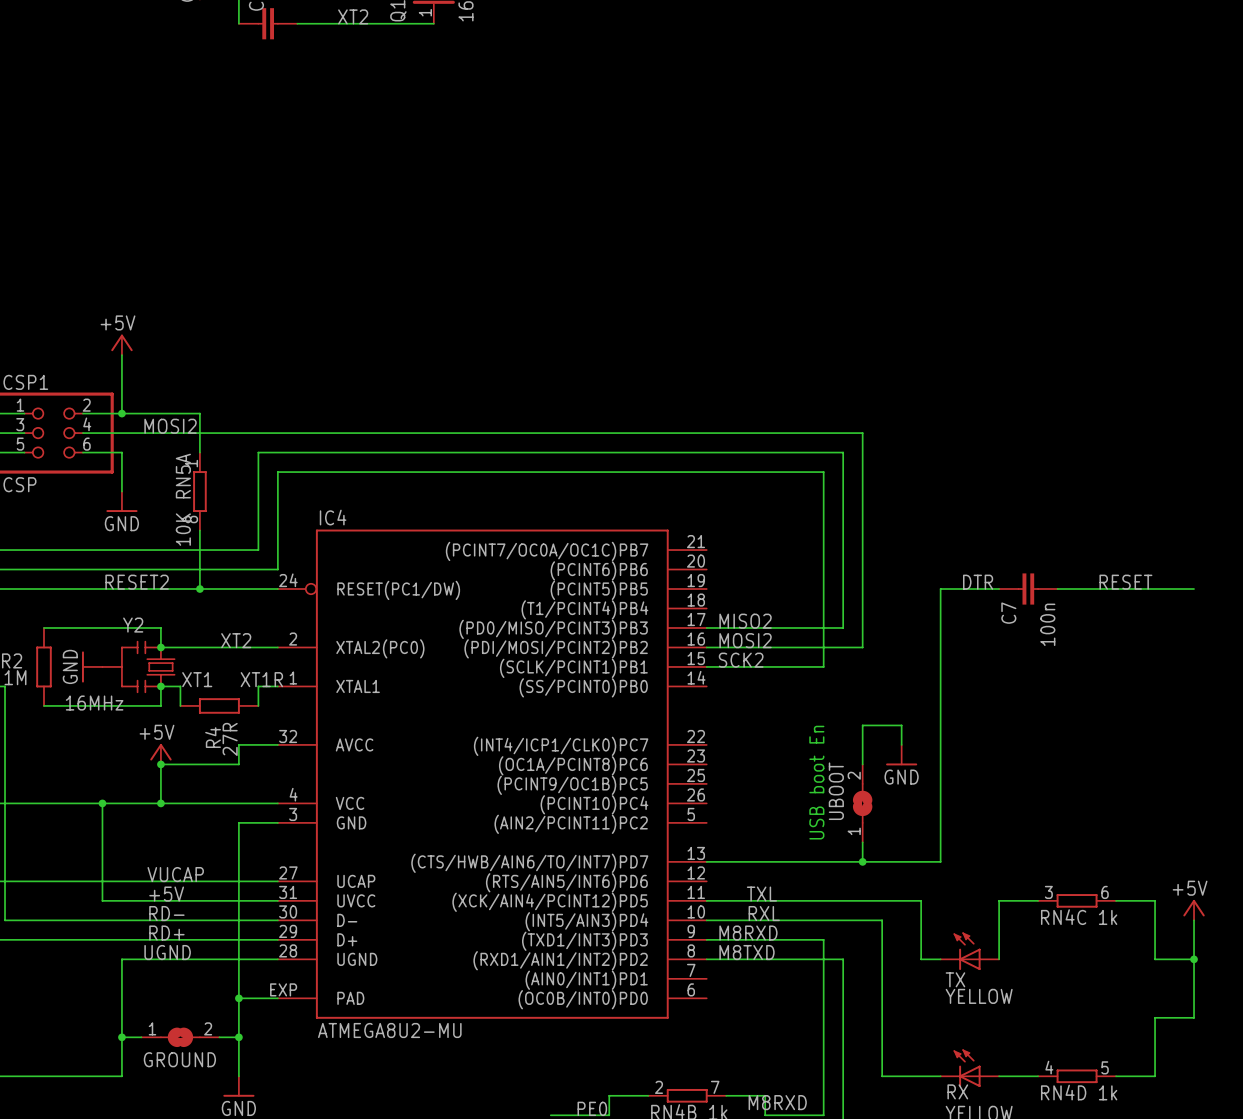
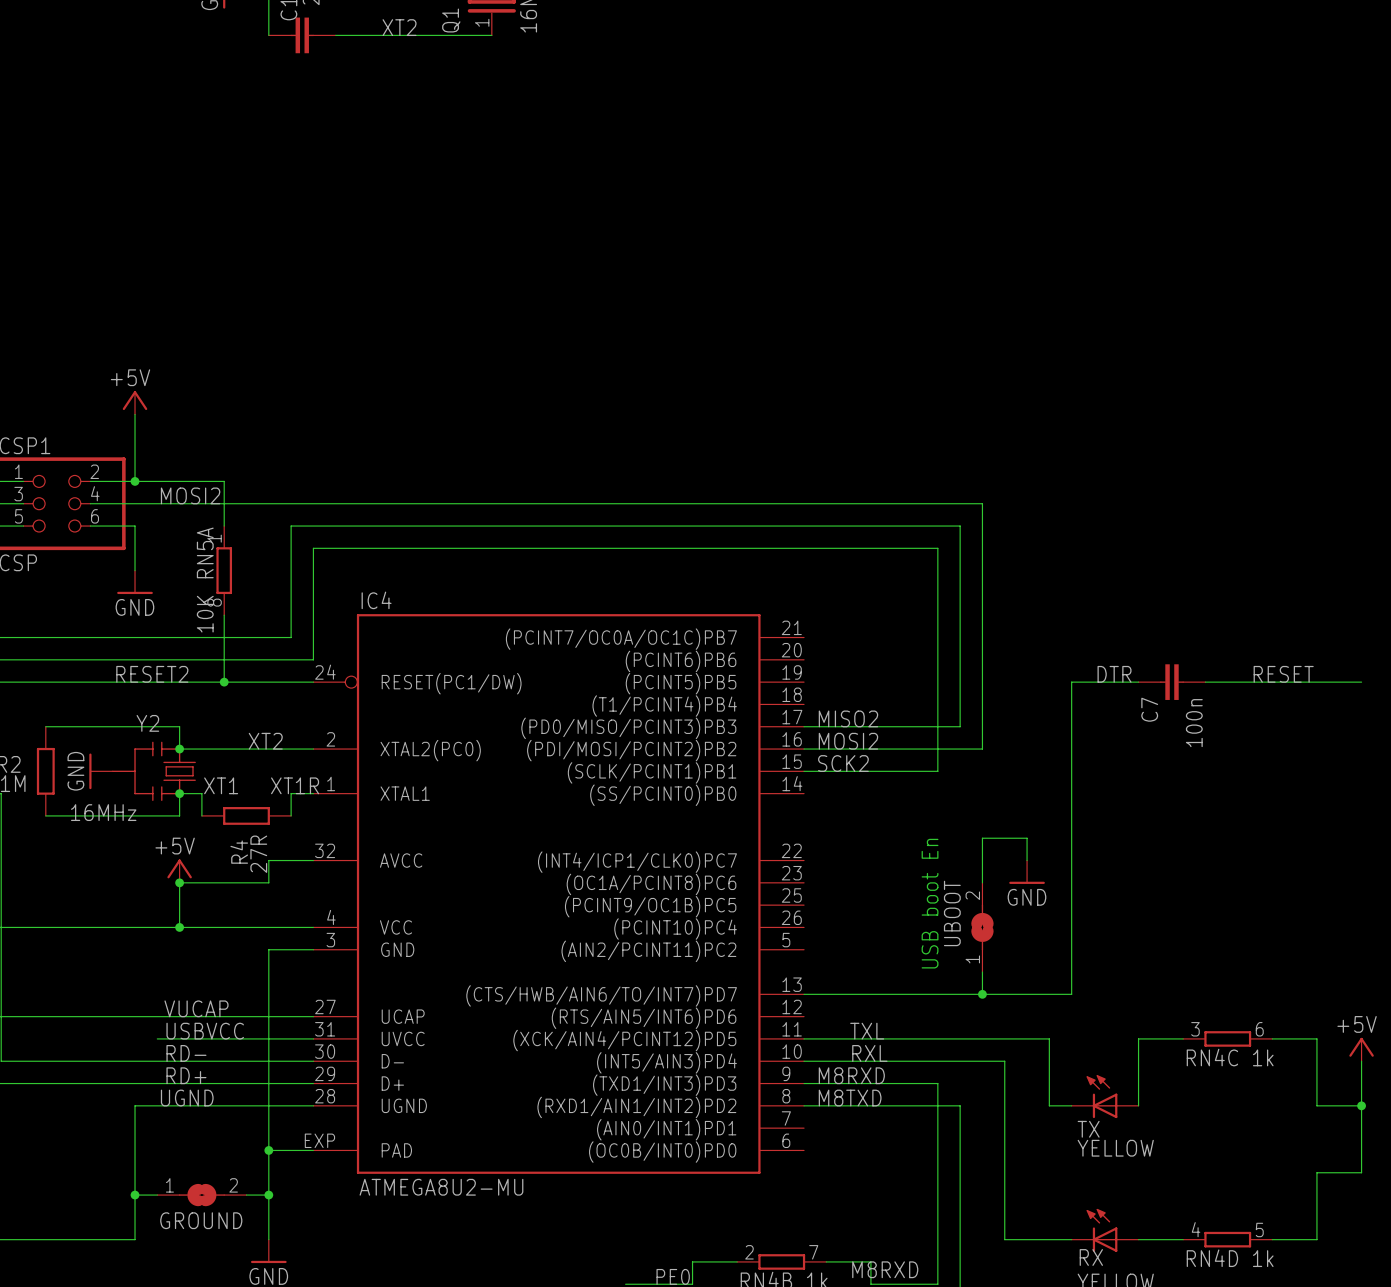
wire: (102, 803) (102, 900) (141, 900) -> none
junction: (102, 803) -> none
label: +5V (166, 894) -> USBVCC (205, 1031)

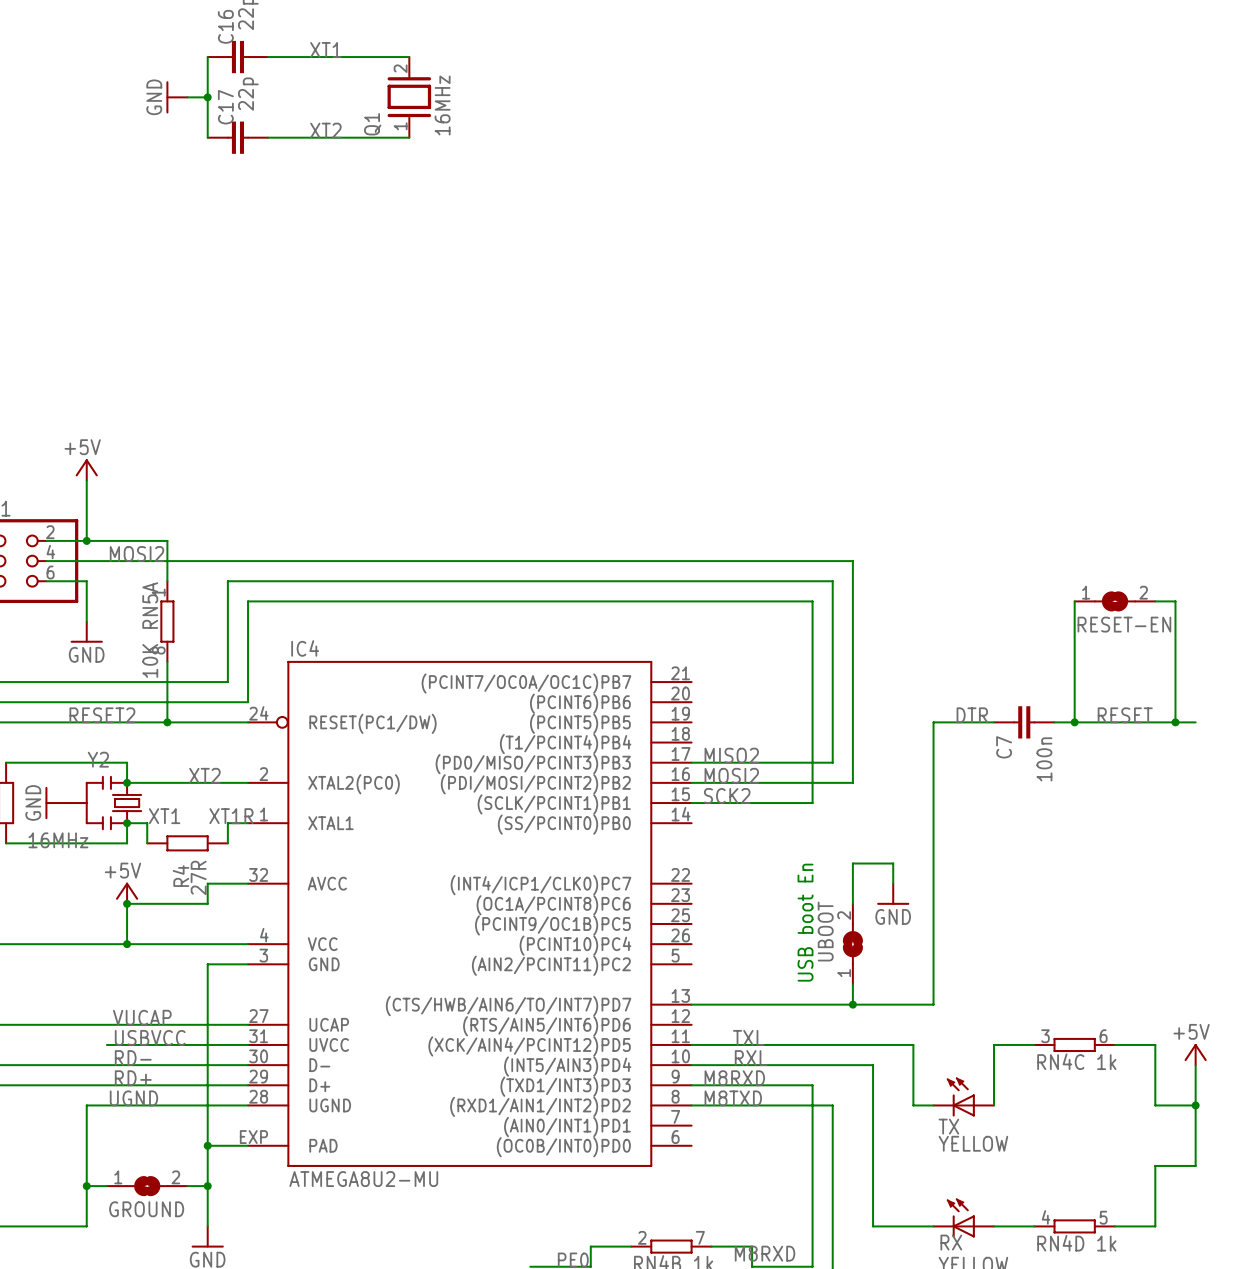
wire: none -> (1074, 601) (1074, 722)
RESET-EN: none -> (1115, 601)
wire: none -> (1155, 601) (1175, 601) (1175, 722)
junction: none -> (1074, 722)
junction: none -> (1175, 722)

